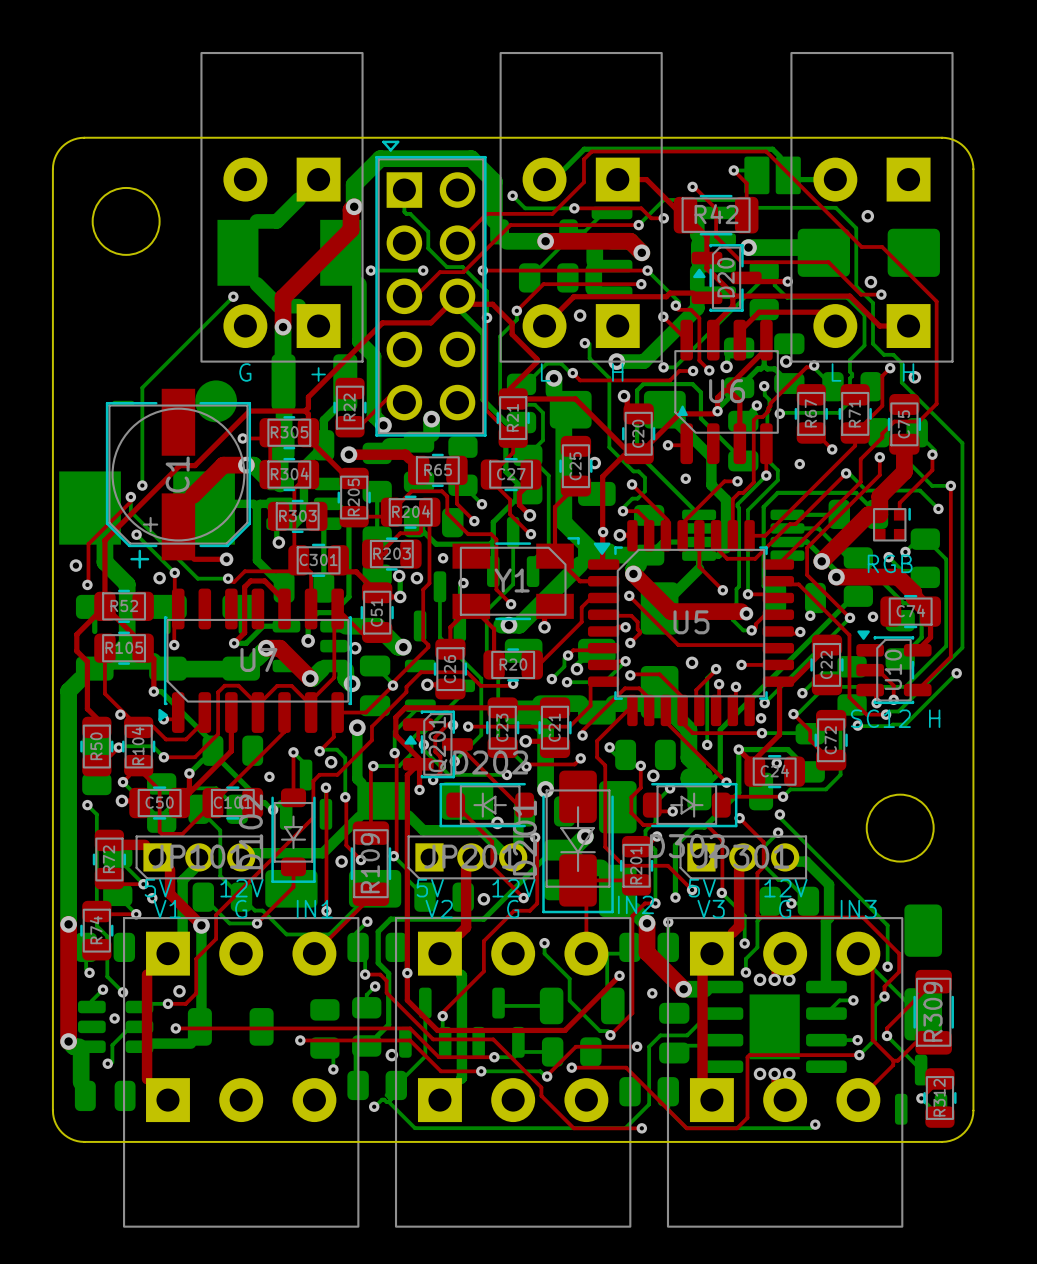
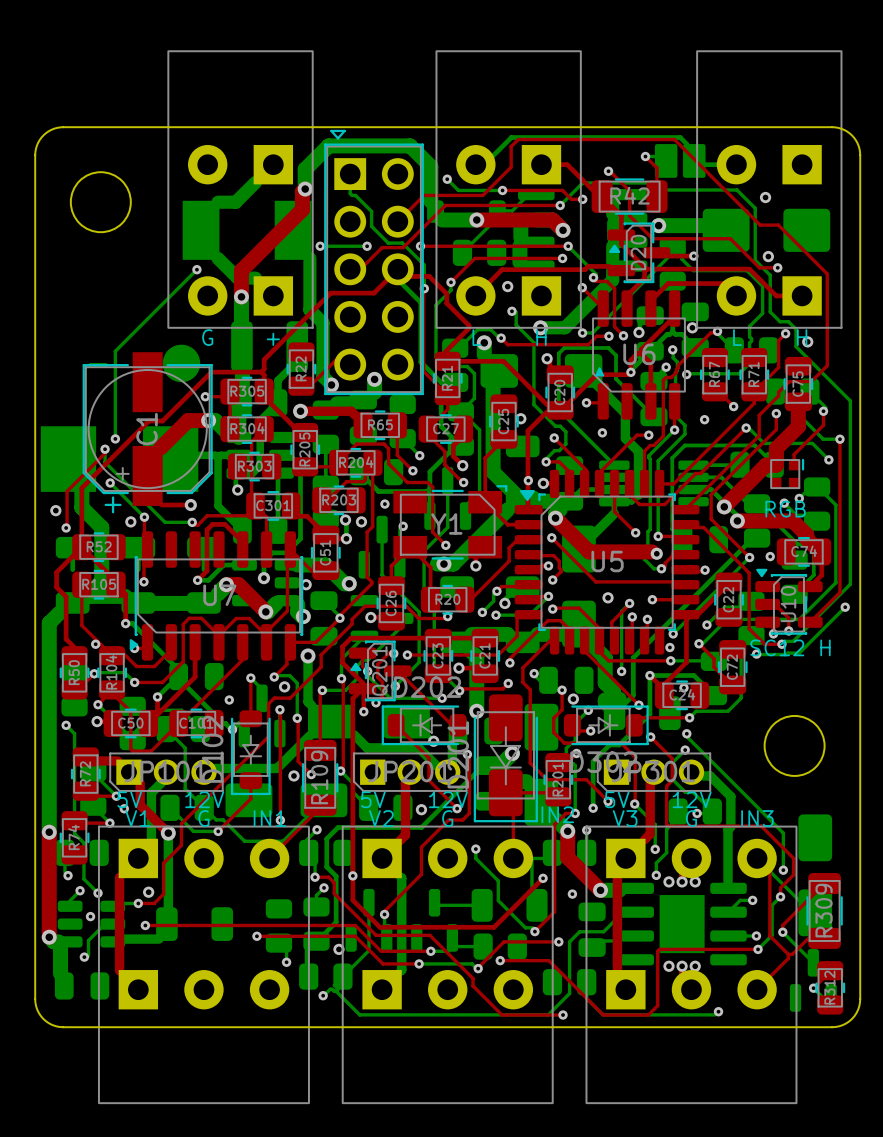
via: (810, 615) -> none

